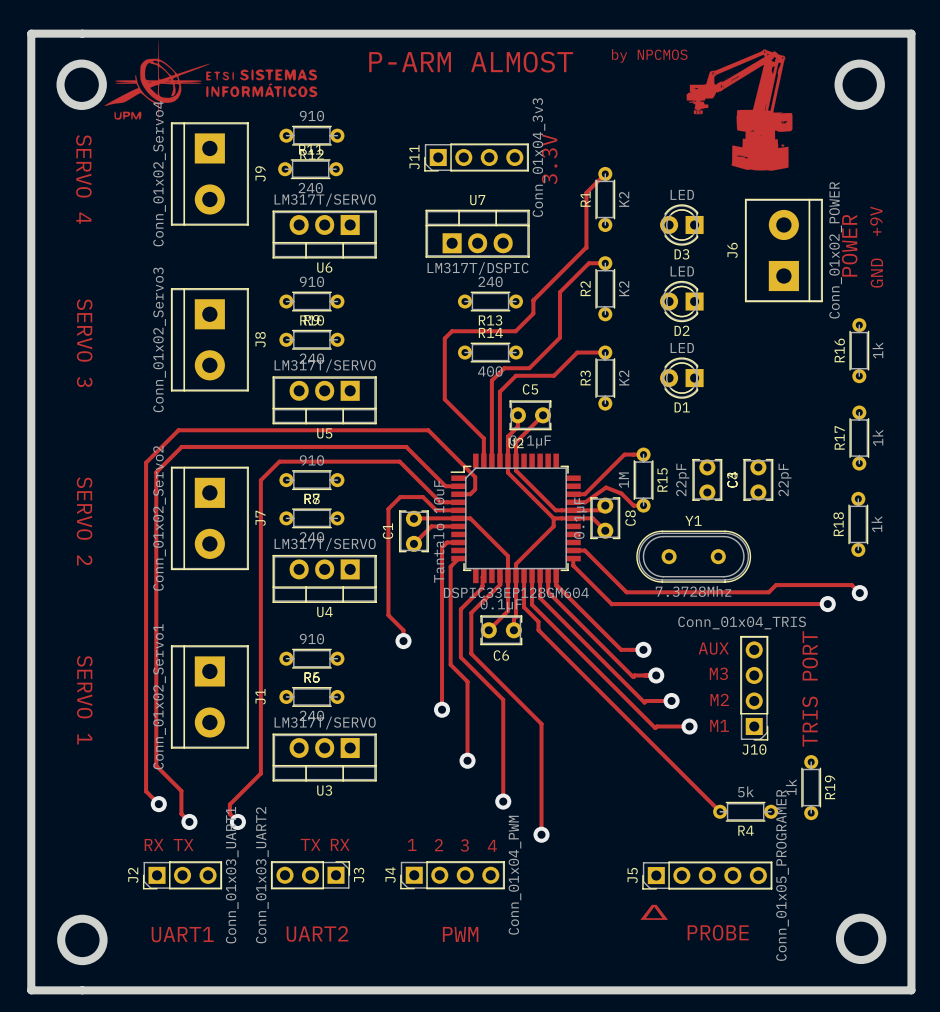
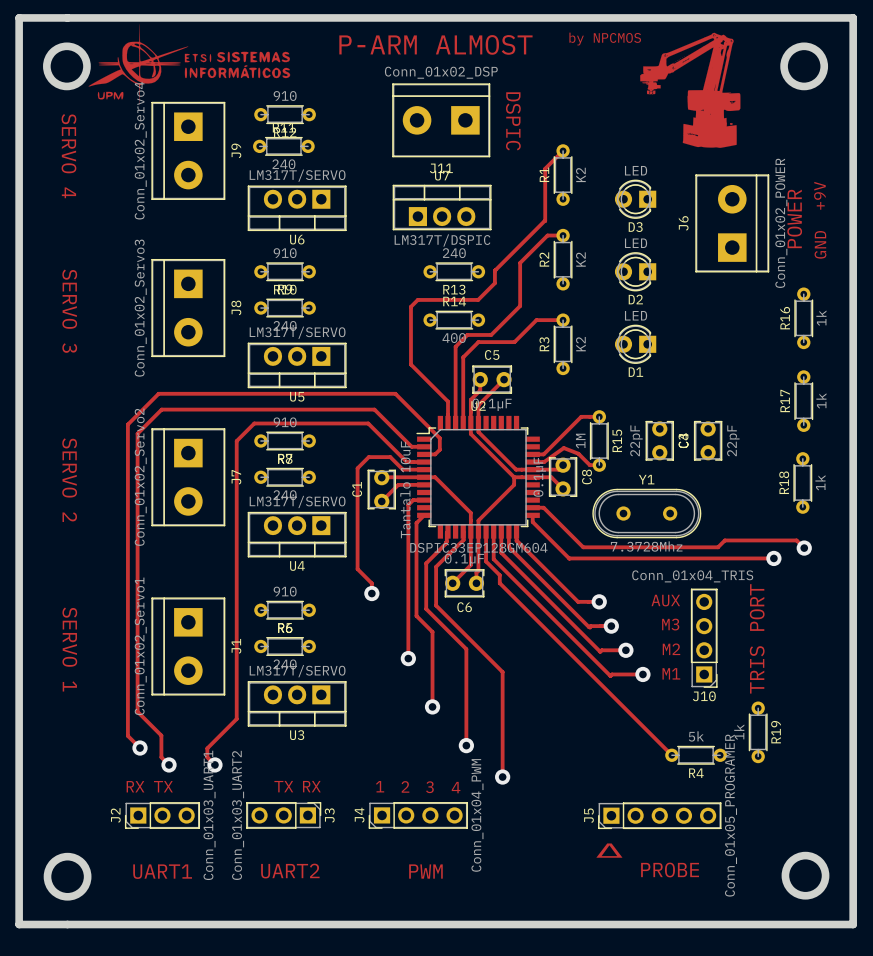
text: none -> DSPIC (513, 121)
J11 footprint: [424, 143, 529, 172] -> [392, 83, 491, 158]
J11 name position: J11 (414, 157) -> J11 (441, 168)
J11 value: Conn_01x04_3v3 (538, 157) -> Conn_01x02_DSP (441, 72)
text: 3.3V (549, 159) -> none

